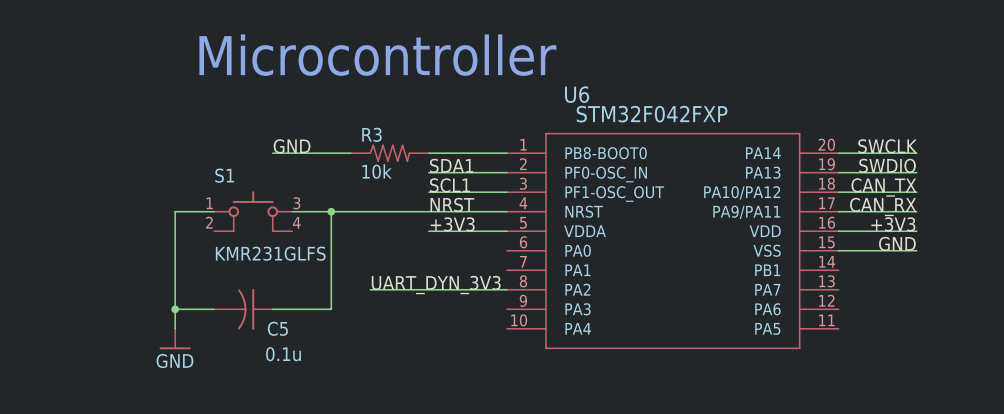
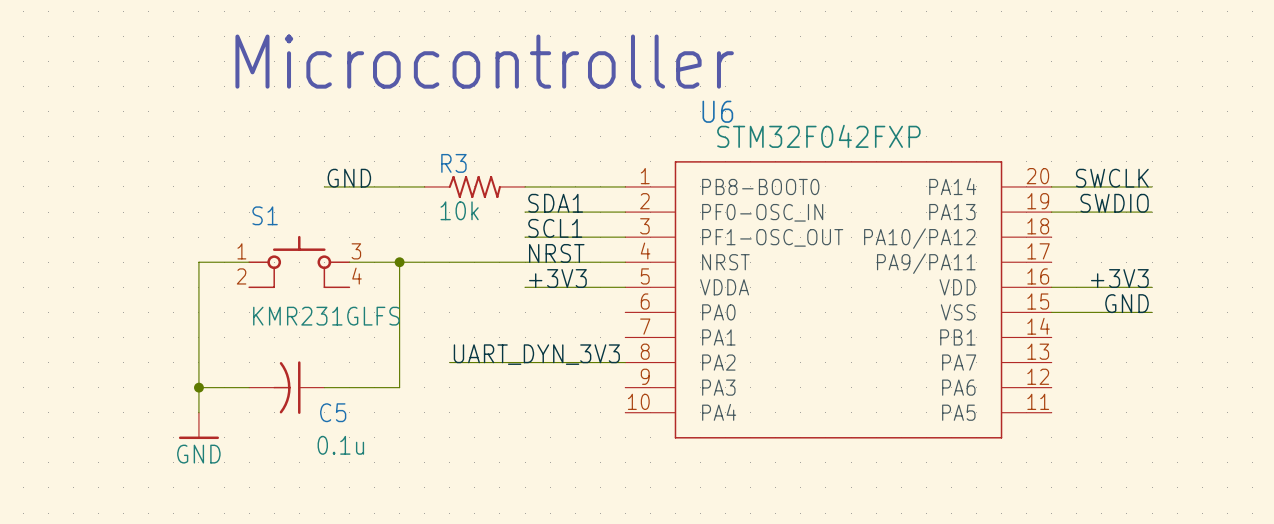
label: CAN_TX (883, 187) -> none
wire: (838, 192) (916, 192) -> none
label: CAN_RX (883, 206) -> none
wire: (838, 211) (916, 211) -> none

